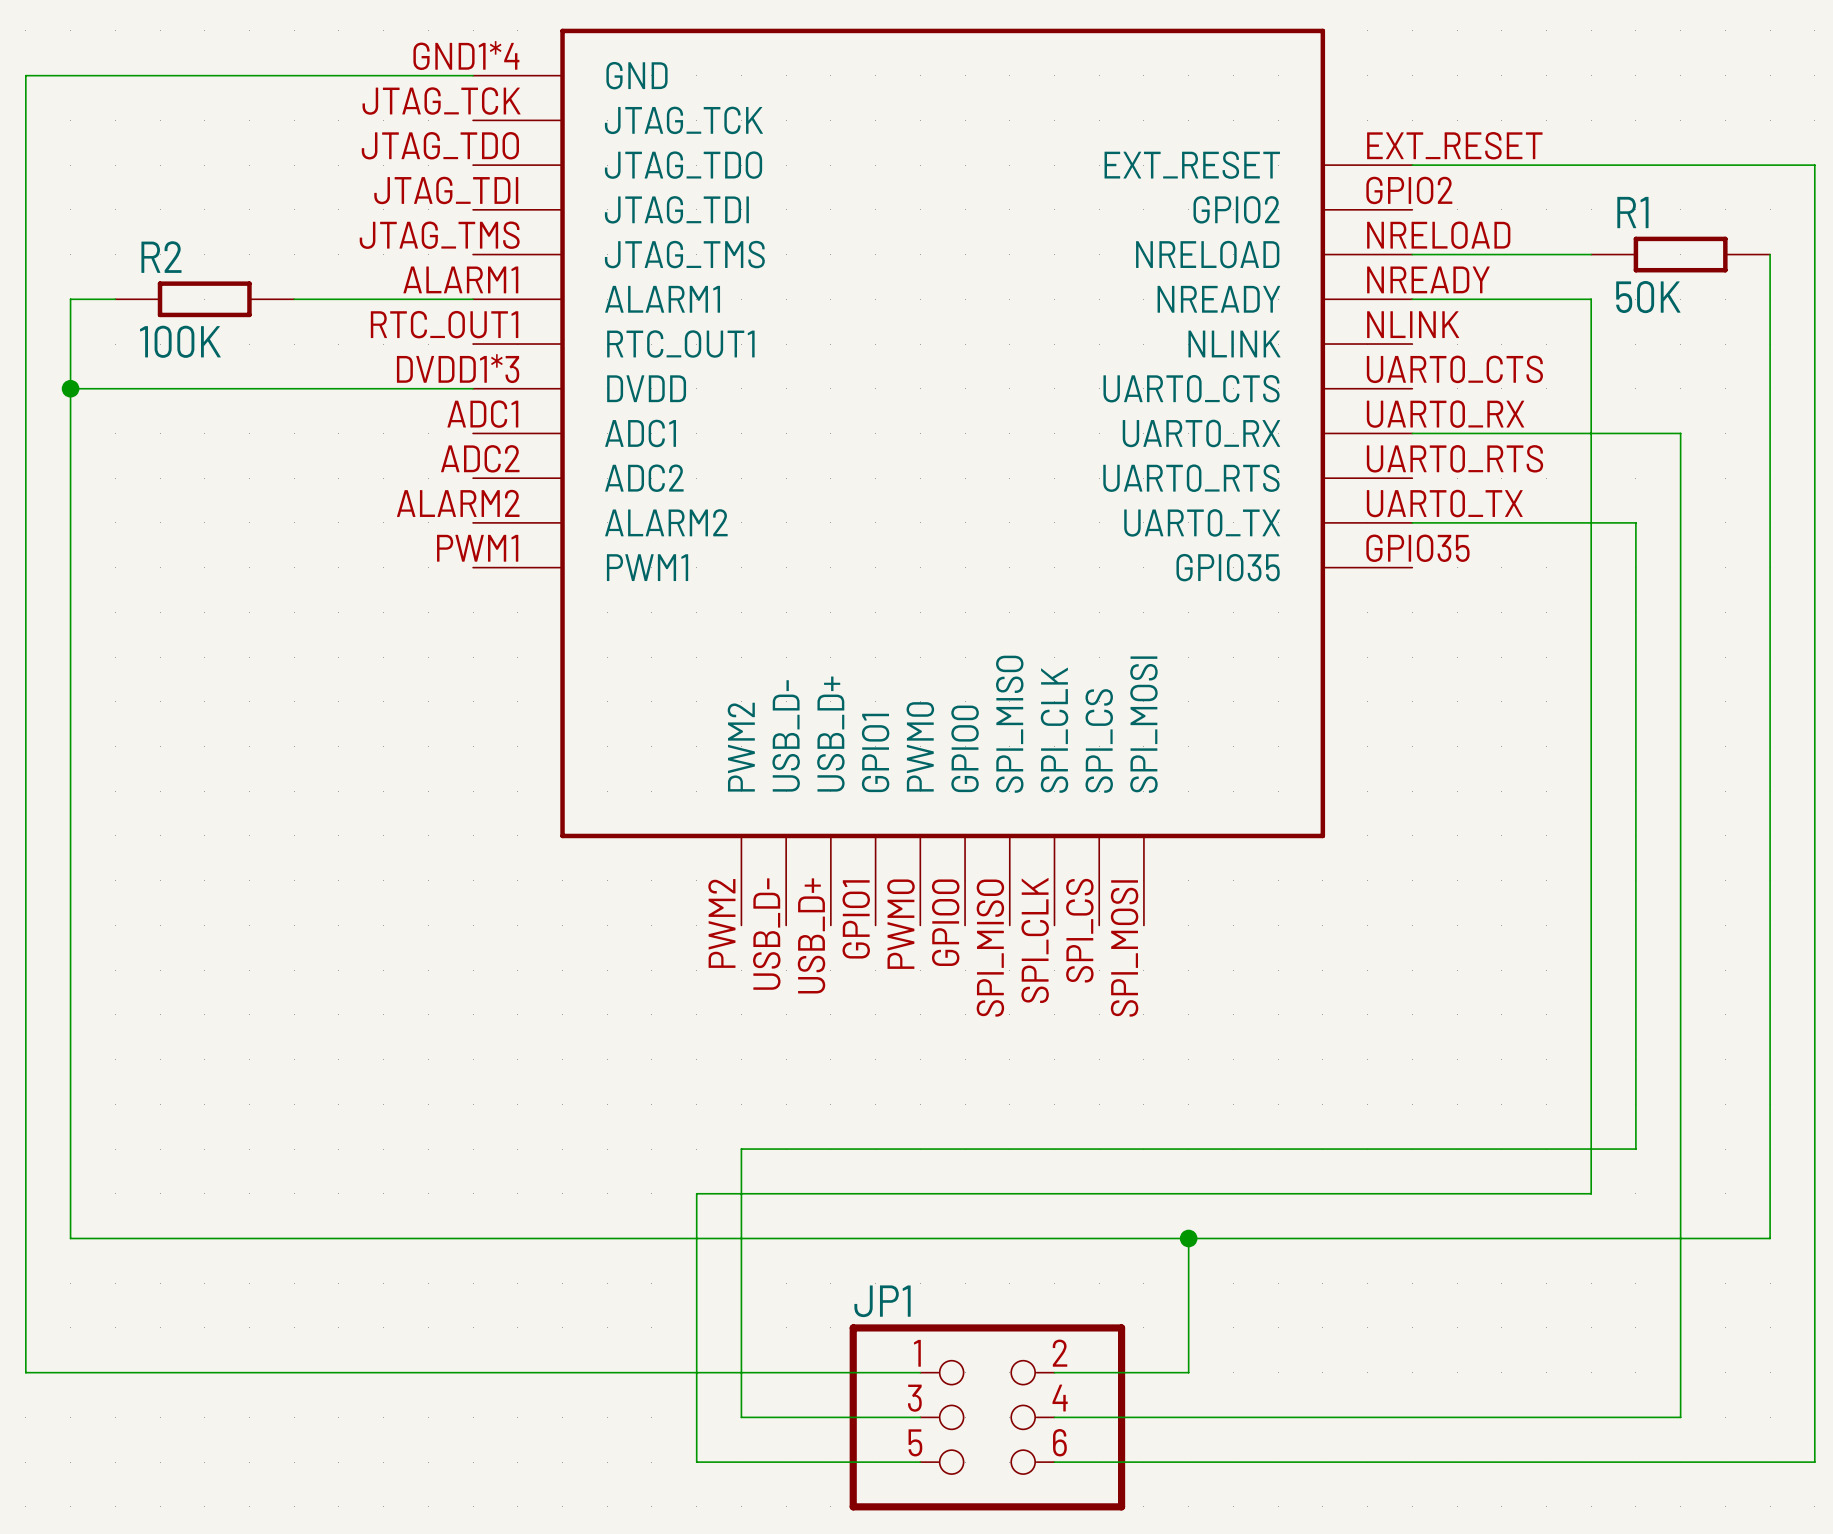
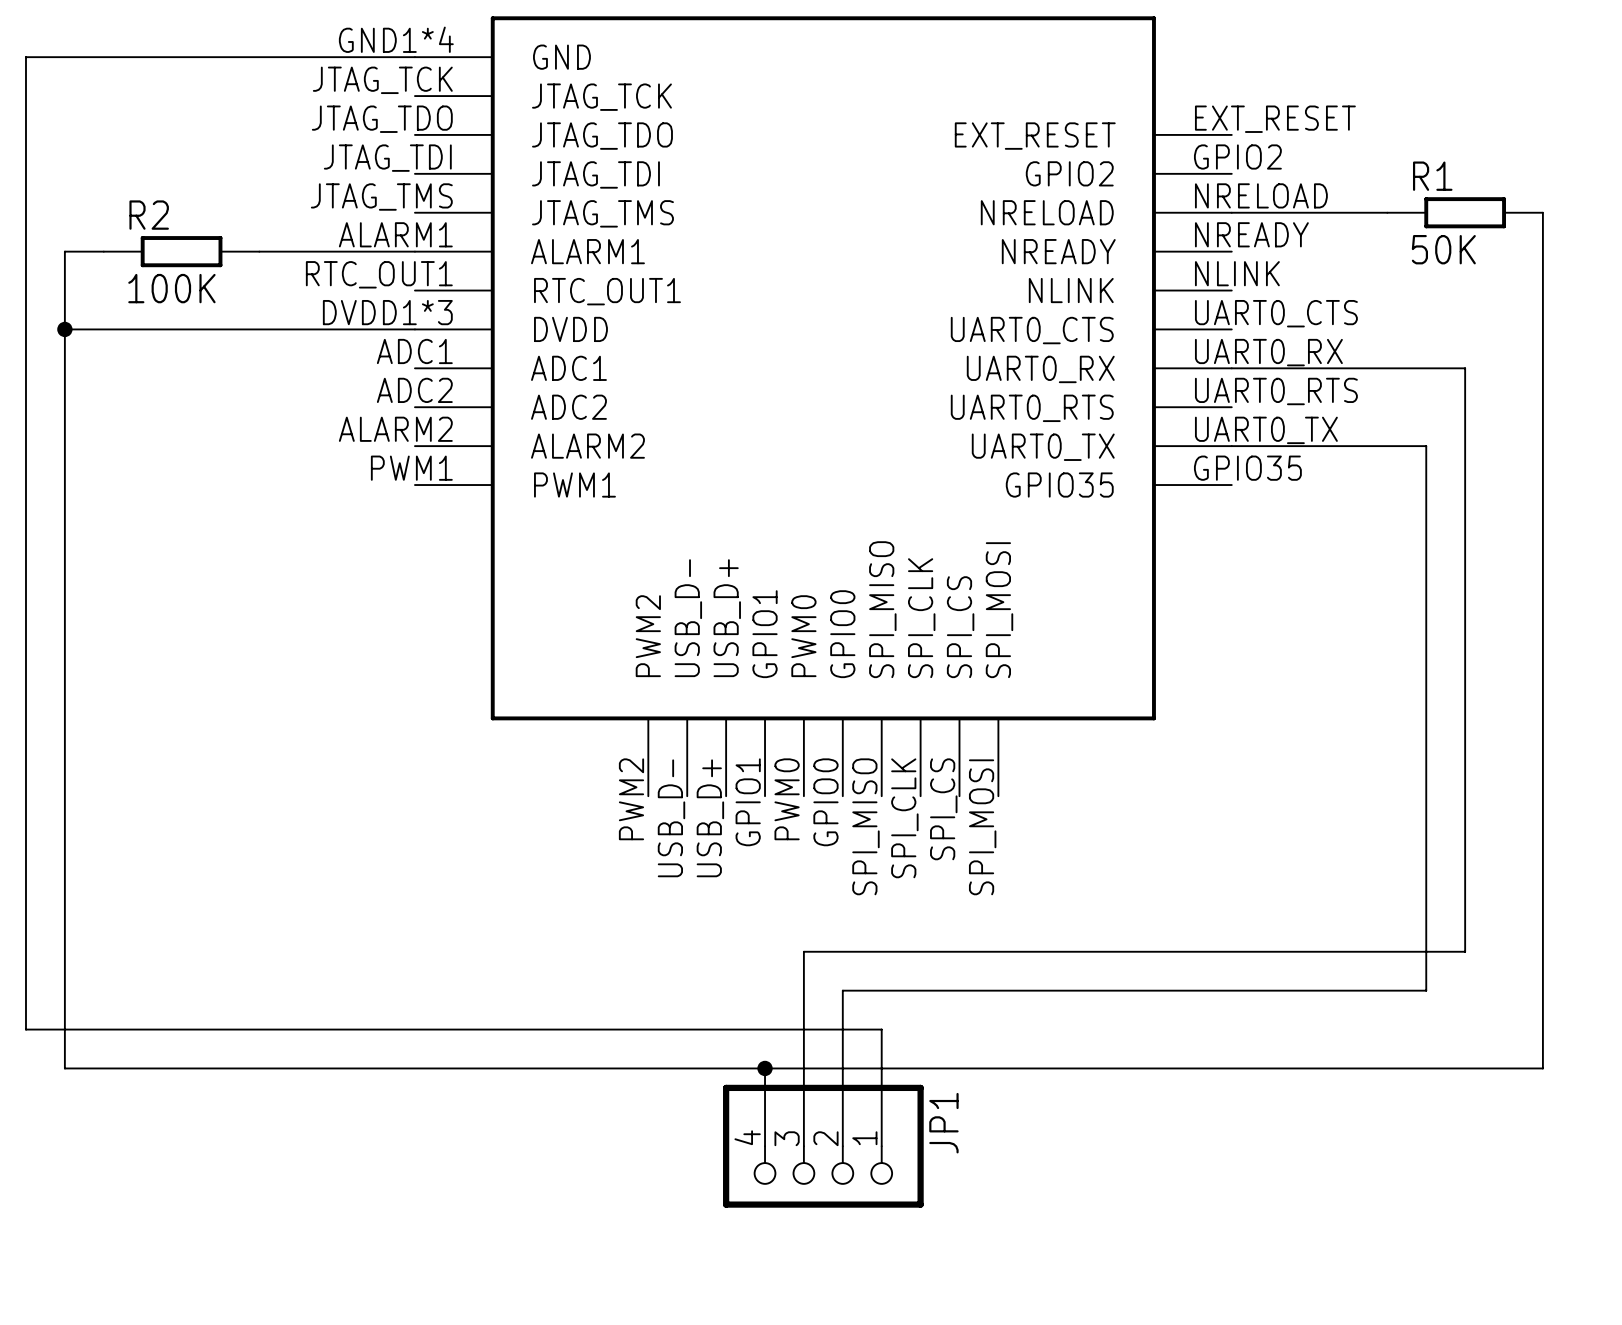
wire: (1412, 165) (1814, 165) (1814, 1462) (1054, 1462) -> none
wire: (1412, 299) (1591, 299) (1591, 1193) (1009, 1193) -> (881, 1146) (881, 1029)
wire: (1680, 1104) (1680, 1417) (1054, 1417) -> (1465, 951) (803, 951) (803, 1146)
wire: (965, 1149) (741, 1149) (741, 1417) (920, 1417) -> (842, 990) (842, 1146)
wire: (25, 1193) (25, 1372) (920, 1372) -> (25, 1029) (609, 1029)
wire: (696, 1193) (696, 1462) (920, 1462) -> none
wire: none -> (765, 1068) (765, 1146)
junction: none -> (765, 1068)
wire: (1188, 1238) (1188, 1372) (1054, 1372) -> none
junction: (1188, 1238) -> none
JP1 name position: JP1 (882, 1301) -> JP1 (943, 1123)
JP1 symbol: [849, 1324, 1126, 1511] -> [723, 1084, 924, 1208]

